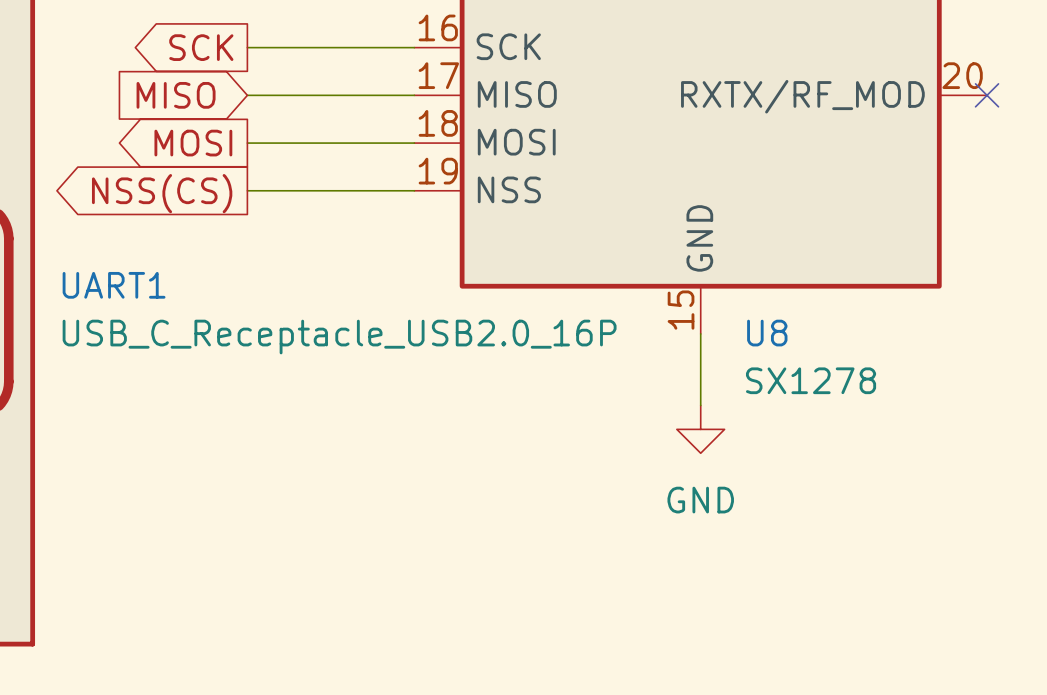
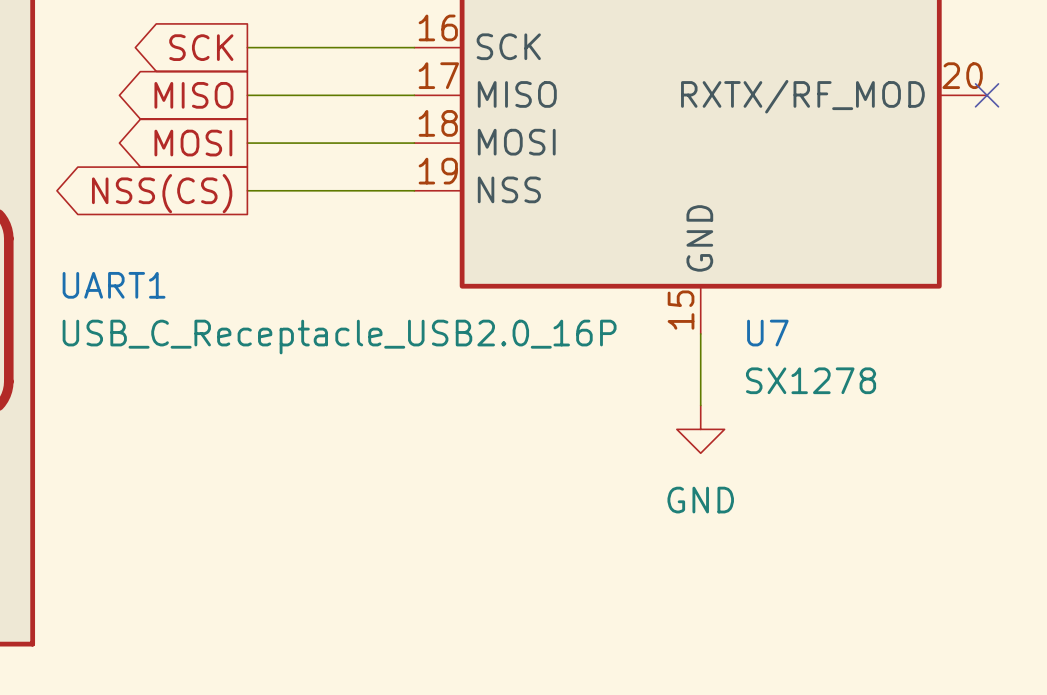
global label shape: input (176, 95) -> output (193, 95)
U8 name: U8 (767, 333) -> U7 (767, 333)

